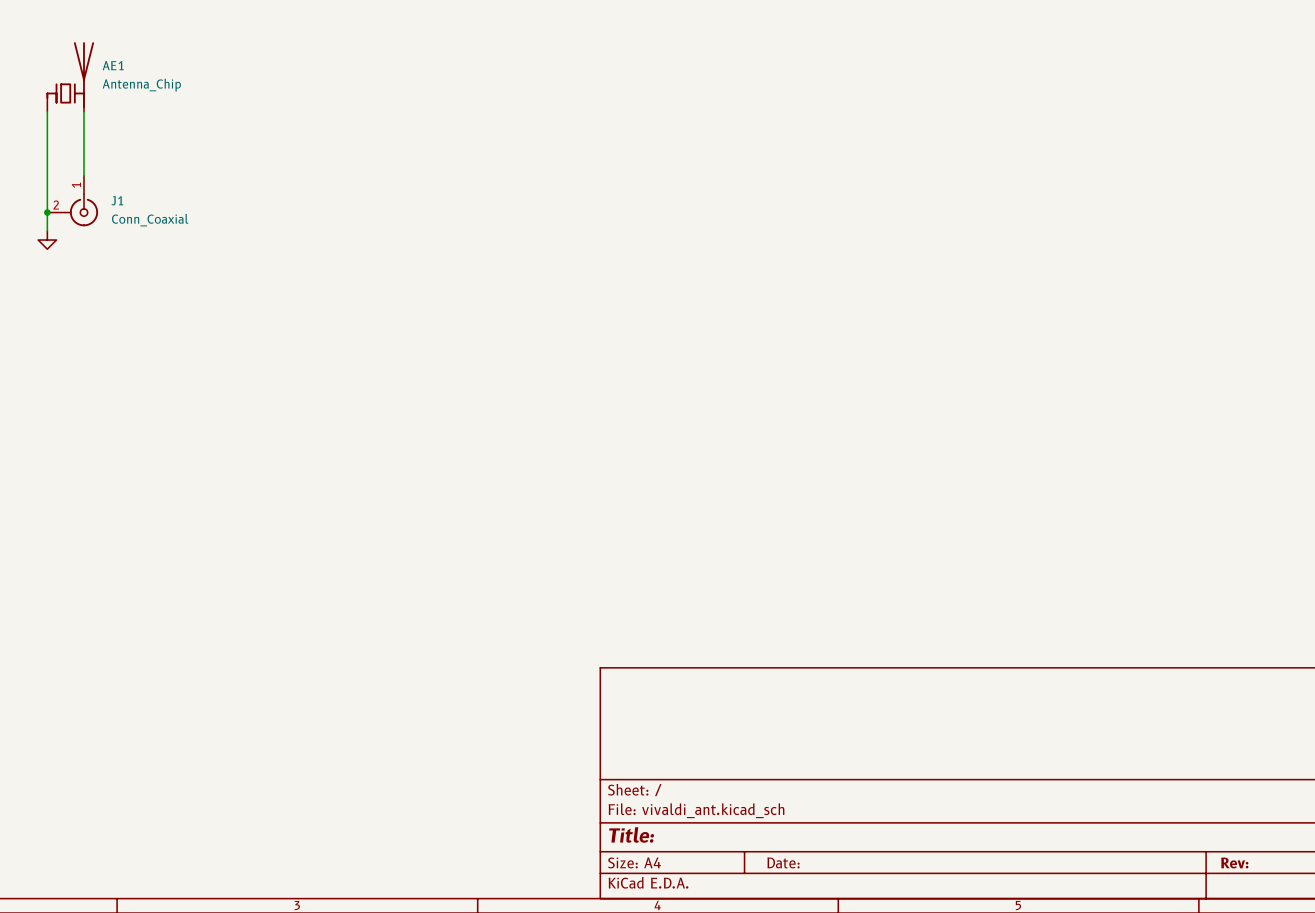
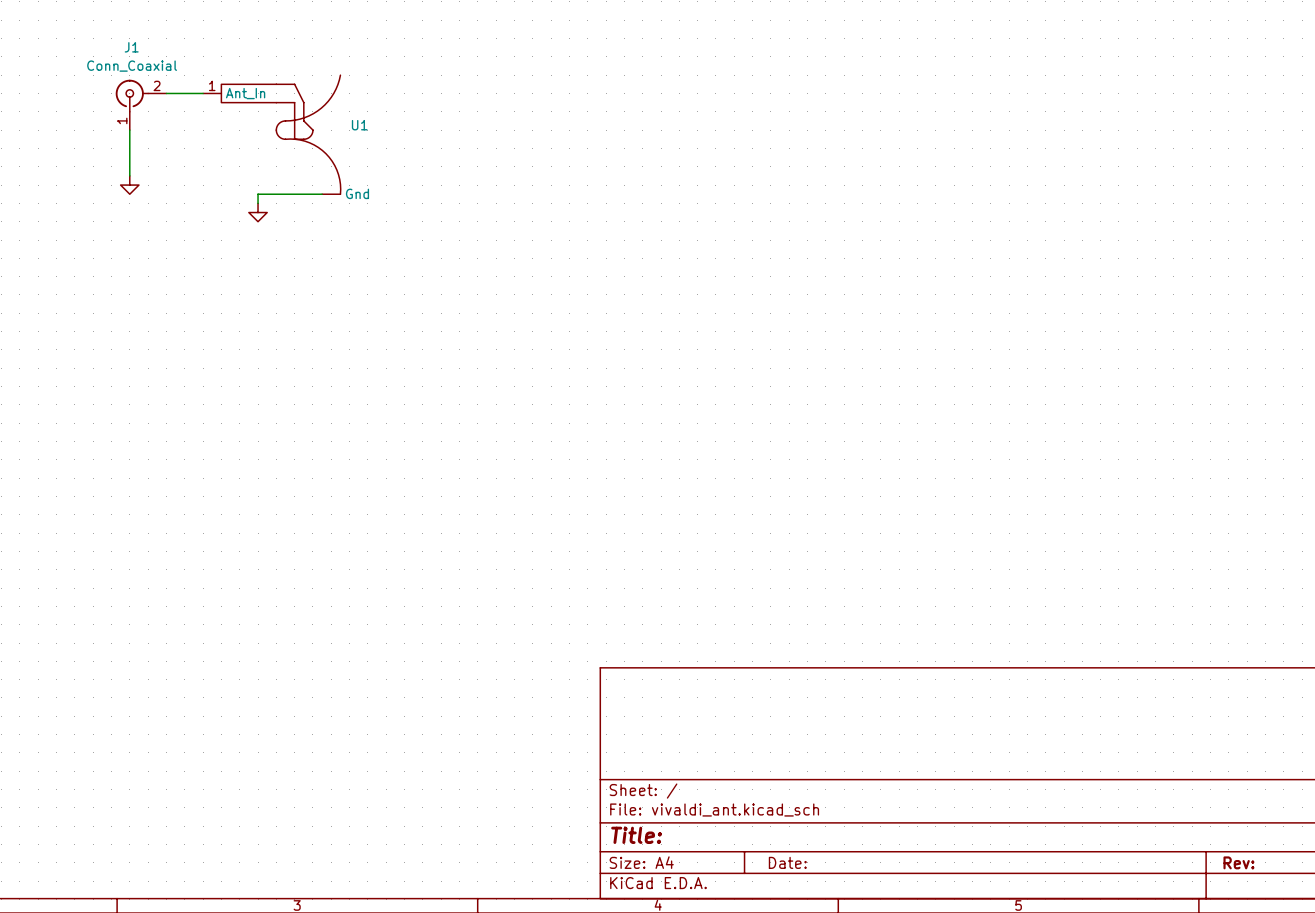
AE1: Antenna_Chip (70, 76) -> none
wire: none -> (166, 93) (203, 93)
wire: (47, 111) (47, 230) -> none
wire: (83, 111) (83, 175) -> none
wire: none -> (129, 130) (129, 175)
U1: none -> (271, 134)
wire: none -> (322, 194) (258, 194) (258, 203)
J1 name position: J1 (117, 200) -> J1 (131, 47)
J1 position: (72, 201) -> (141, 104)
J1 rotation: 0° (81, 210) -> 180° (131, 95)
junction: (47, 212) -> none
power symbol: none -> (258, 212)
J1 value position: Conn_Coaxial (150, 220) -> Conn_Coaxial (132, 66)
power symbol position: (47, 240) -> (129, 185)

